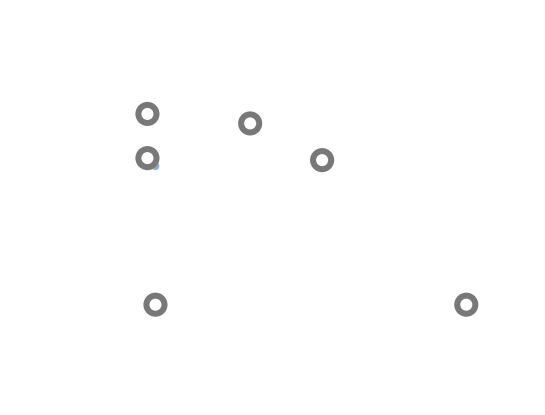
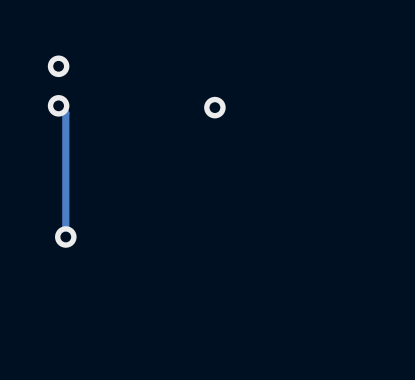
via: (250, 123) -> none
track: none -> (65, 113) (65, 236)
via: (466, 304) -> none

